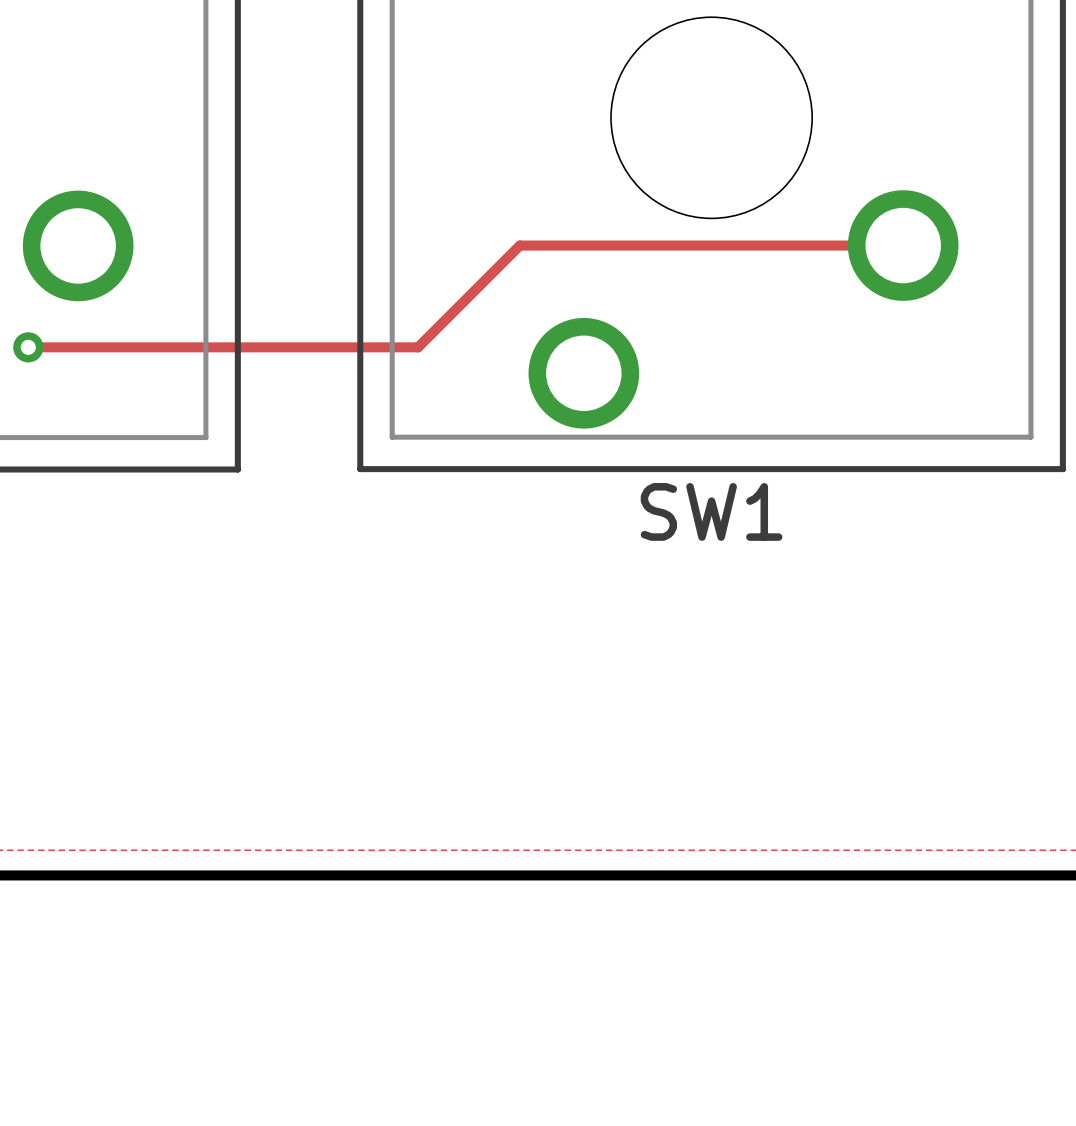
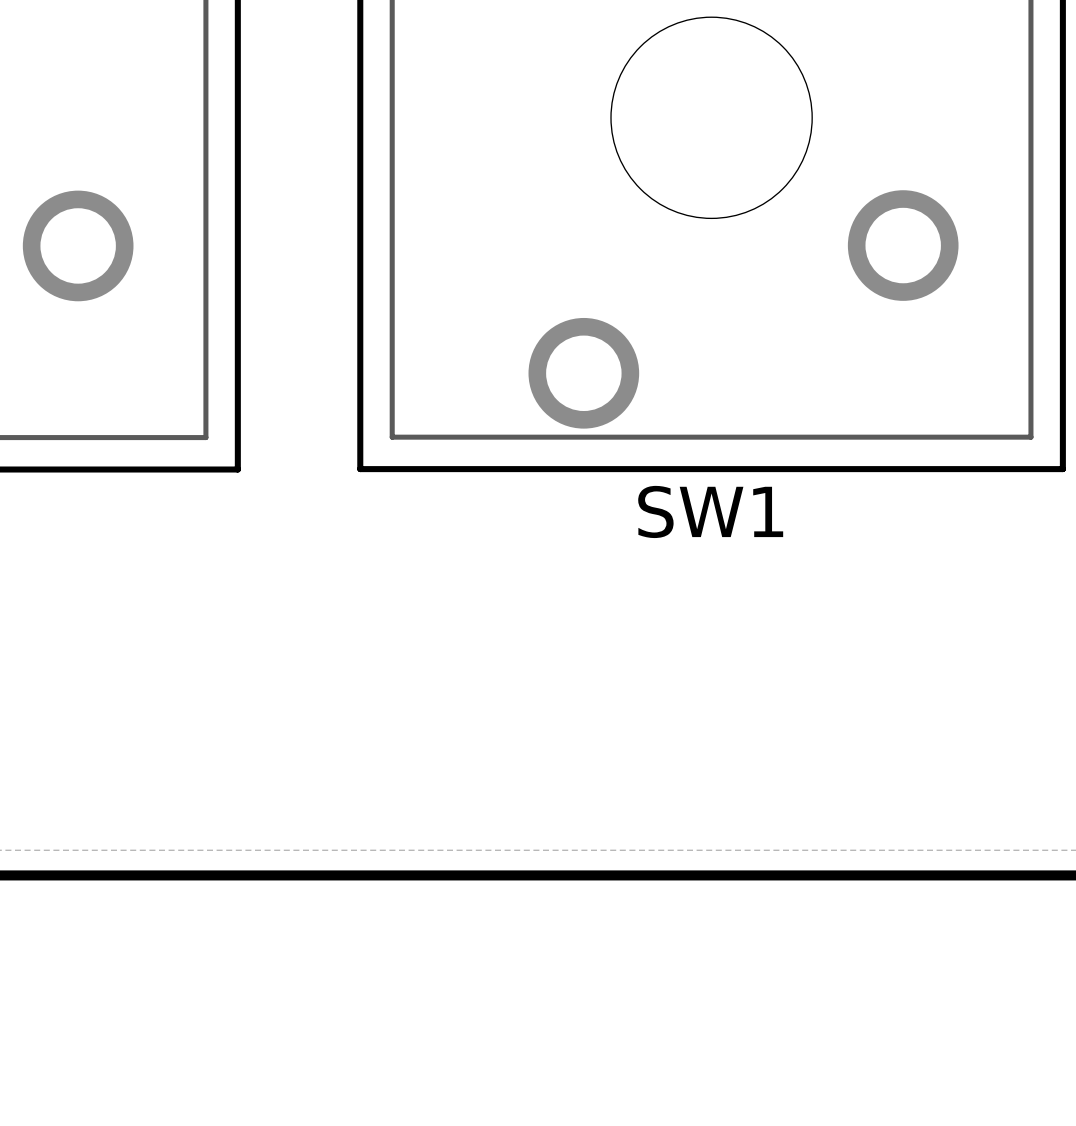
track: (903, 245) (519, 245) (418, 347) (28, 347) -> none
via: (28, 347) -> none

